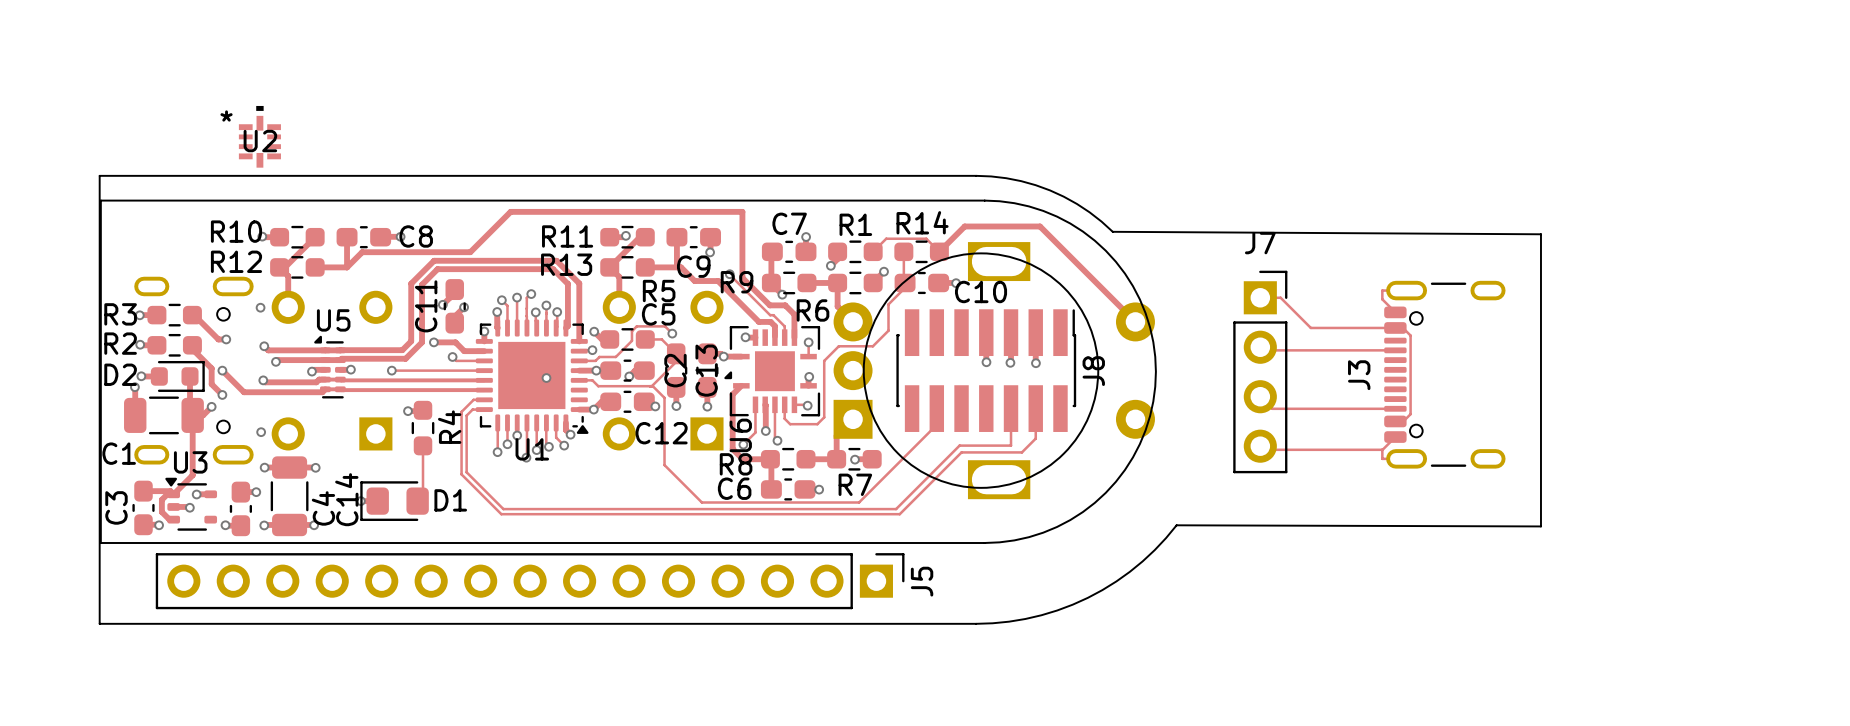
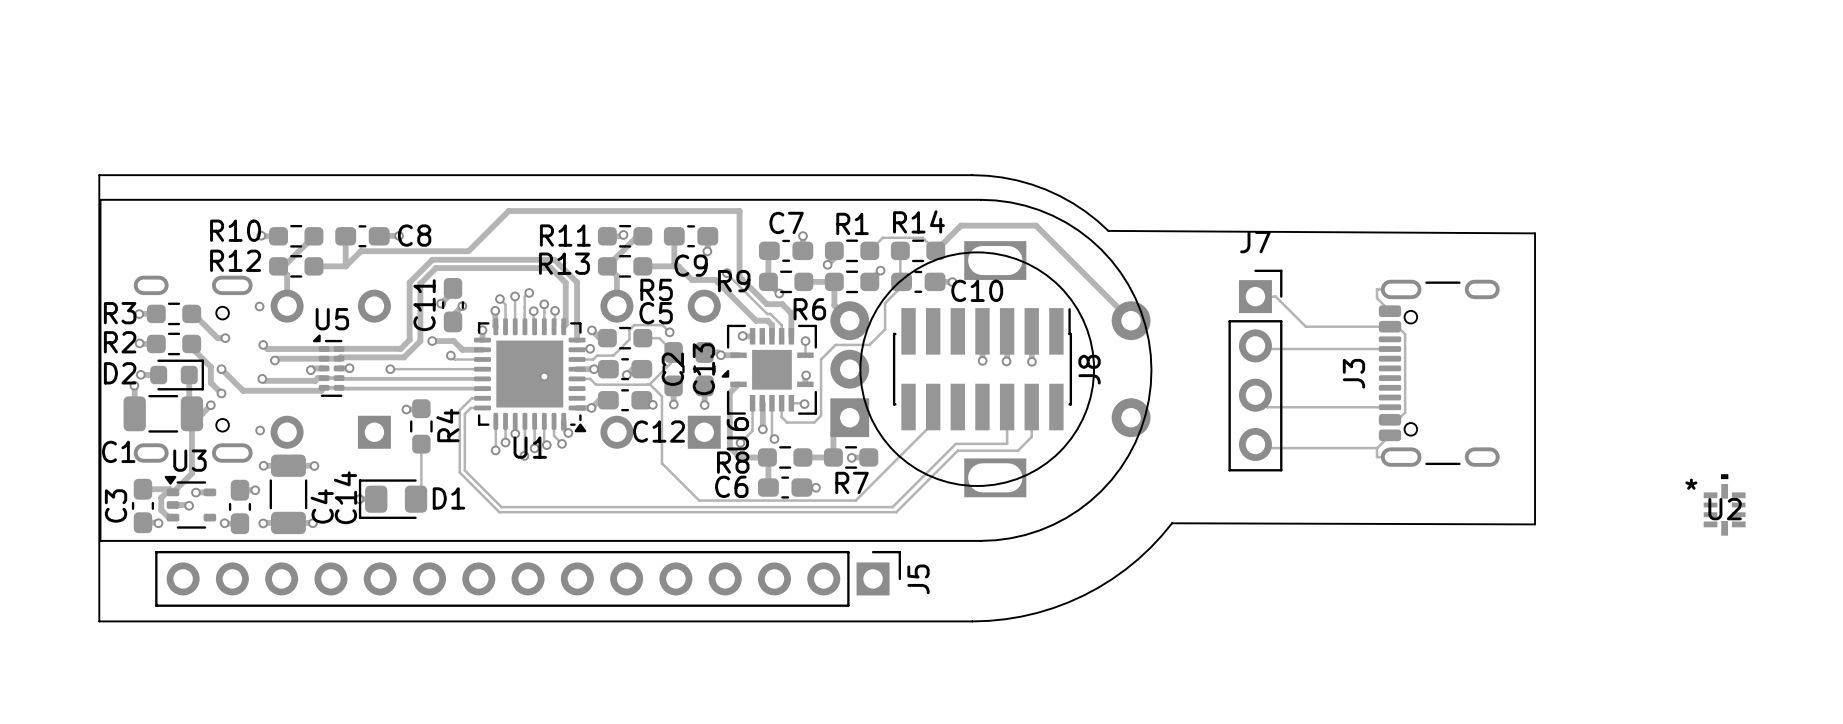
U2 position: (259, 136) -> (1724, 504)

